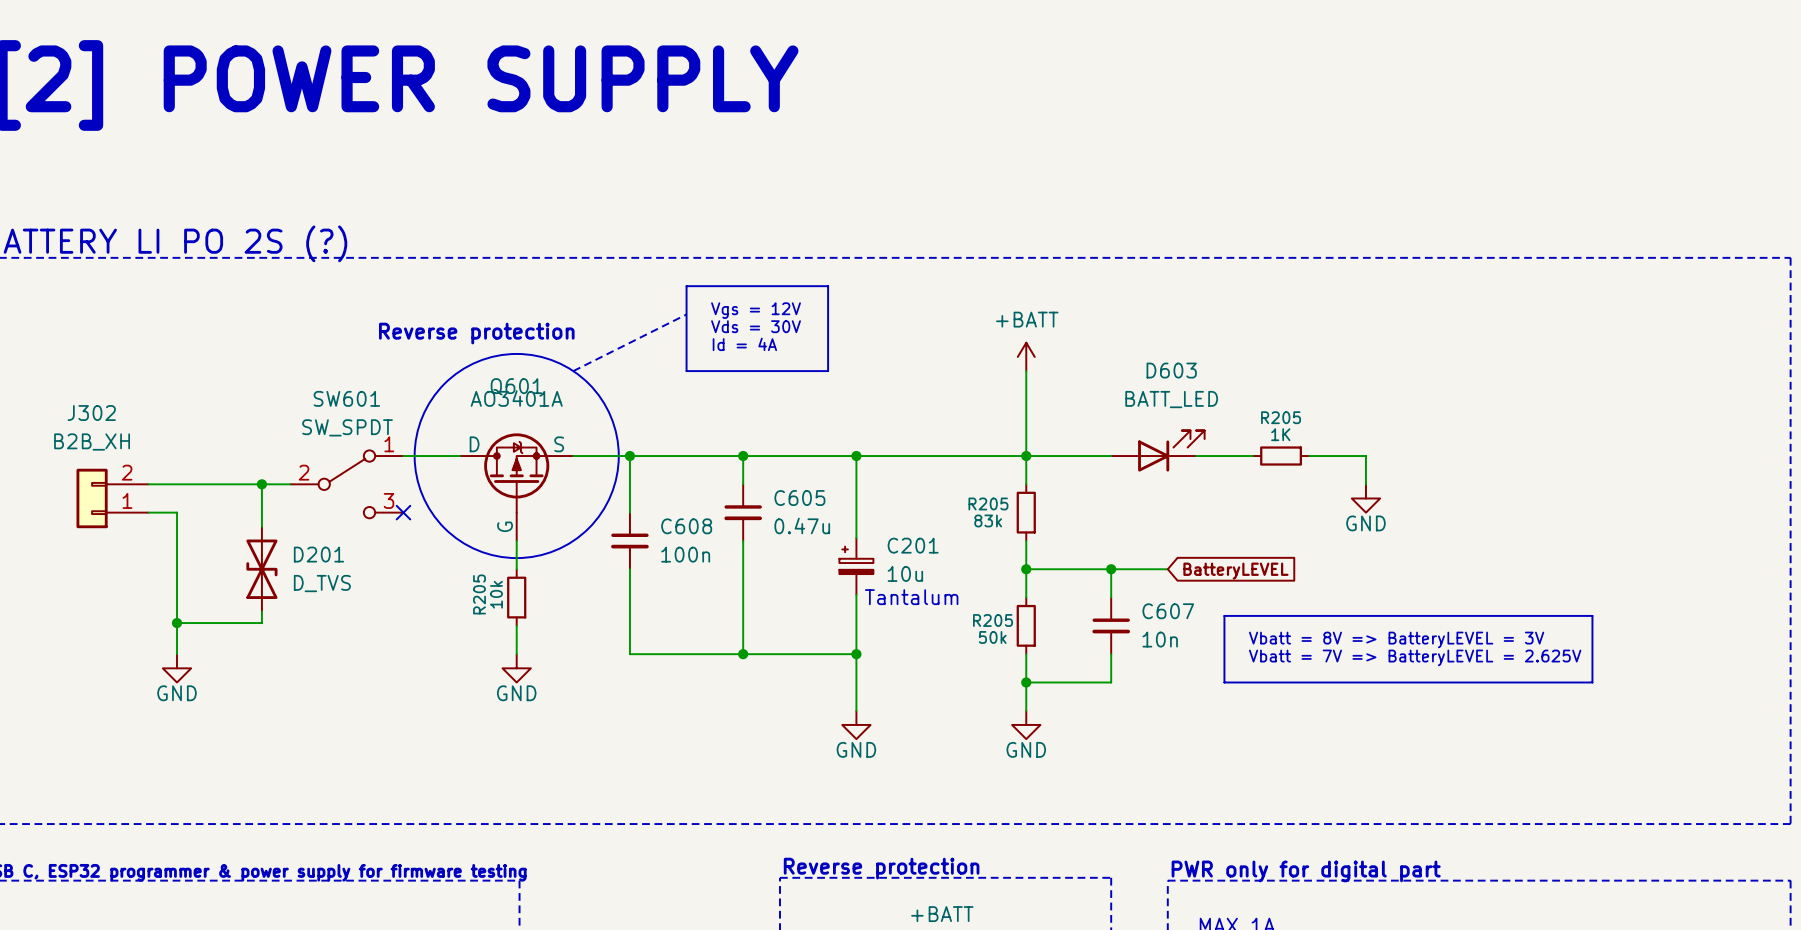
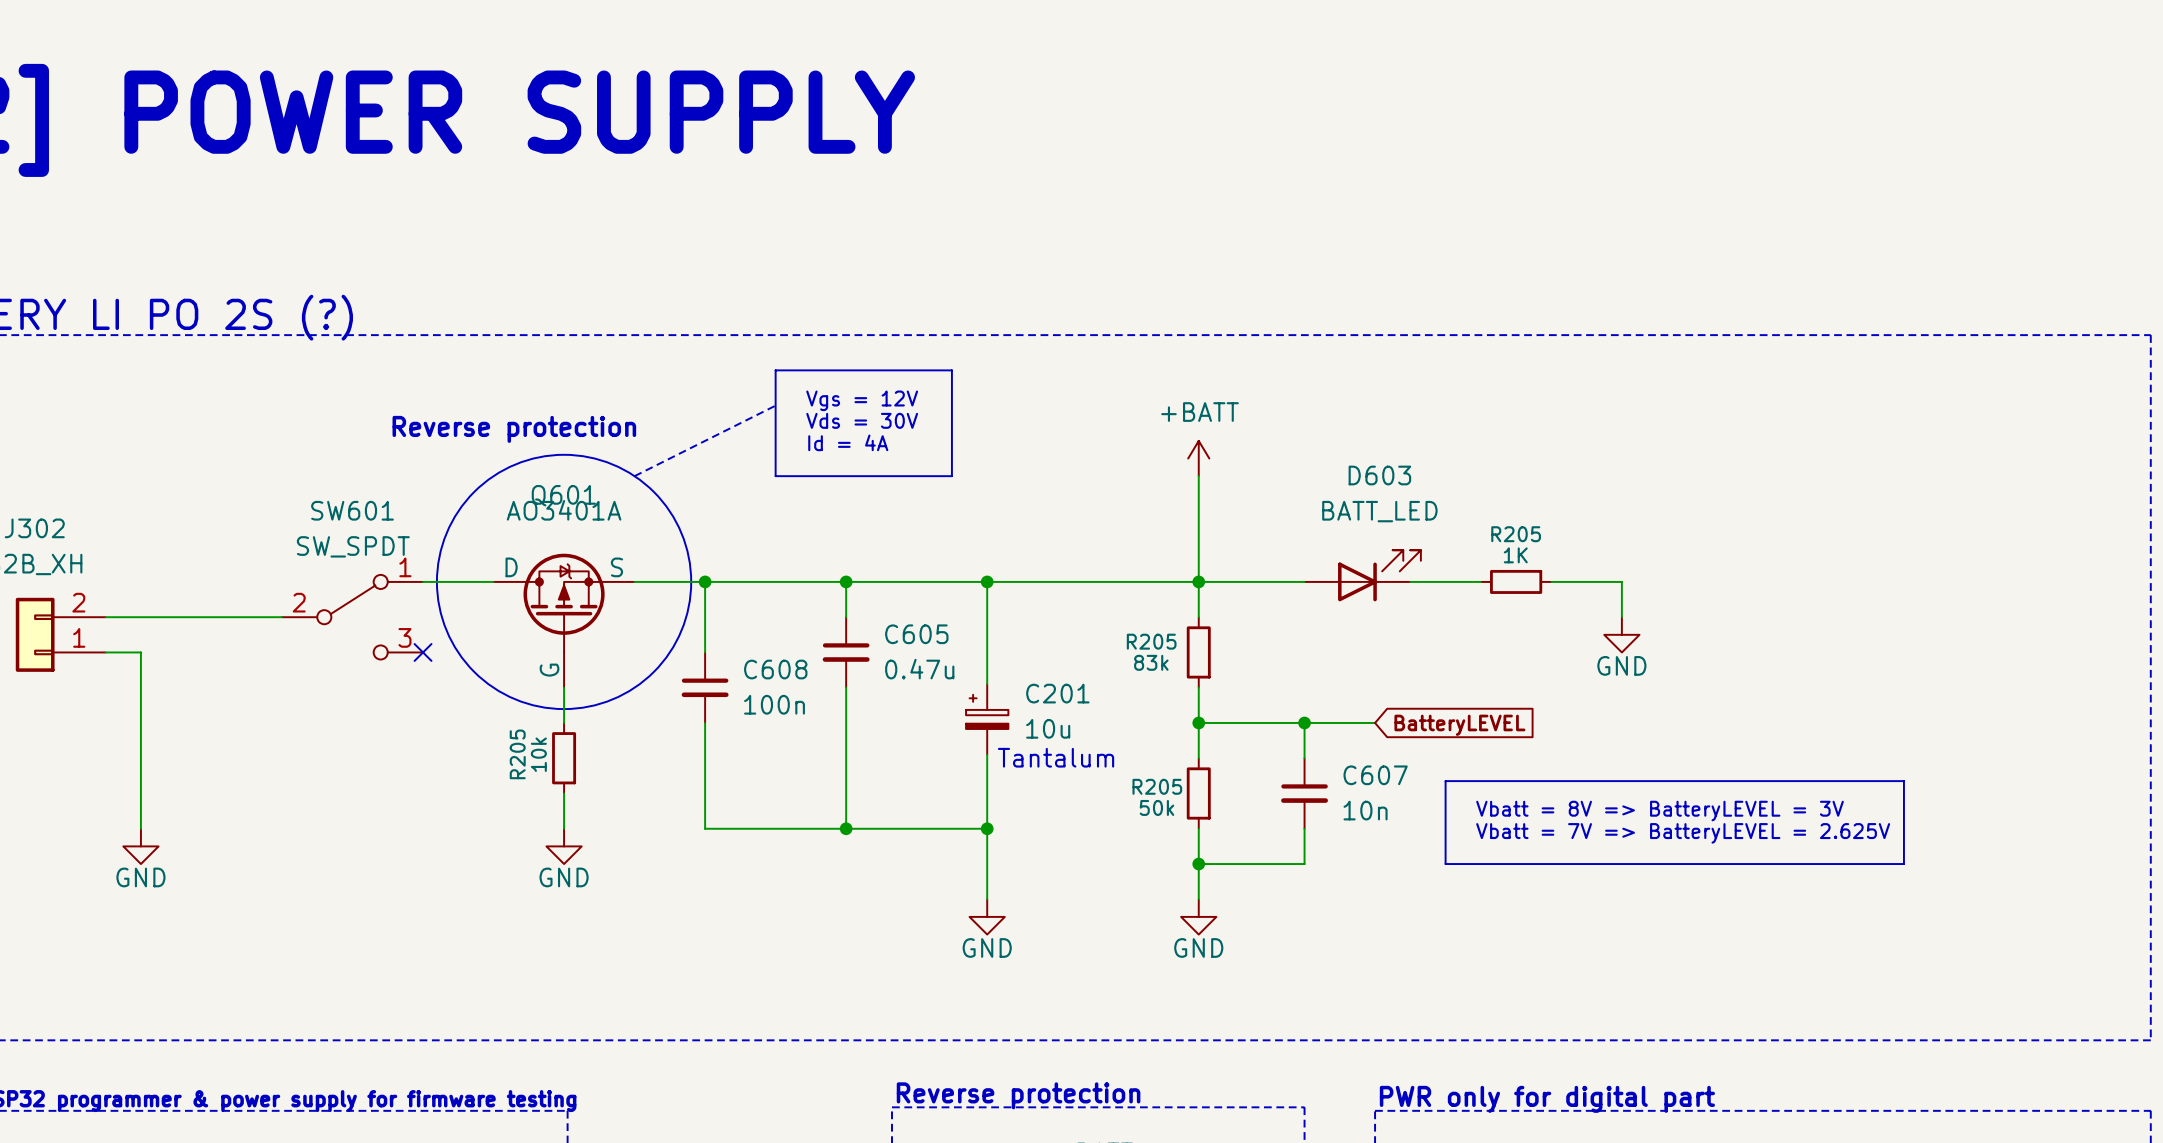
wire: (261, 484) (261, 526) -> none
junction: (261, 484) -> none
D201: D_TVS (261, 569) -> none
wire: (261, 611) (261, 623) (177, 623) -> none
junction: (177, 623) -> none

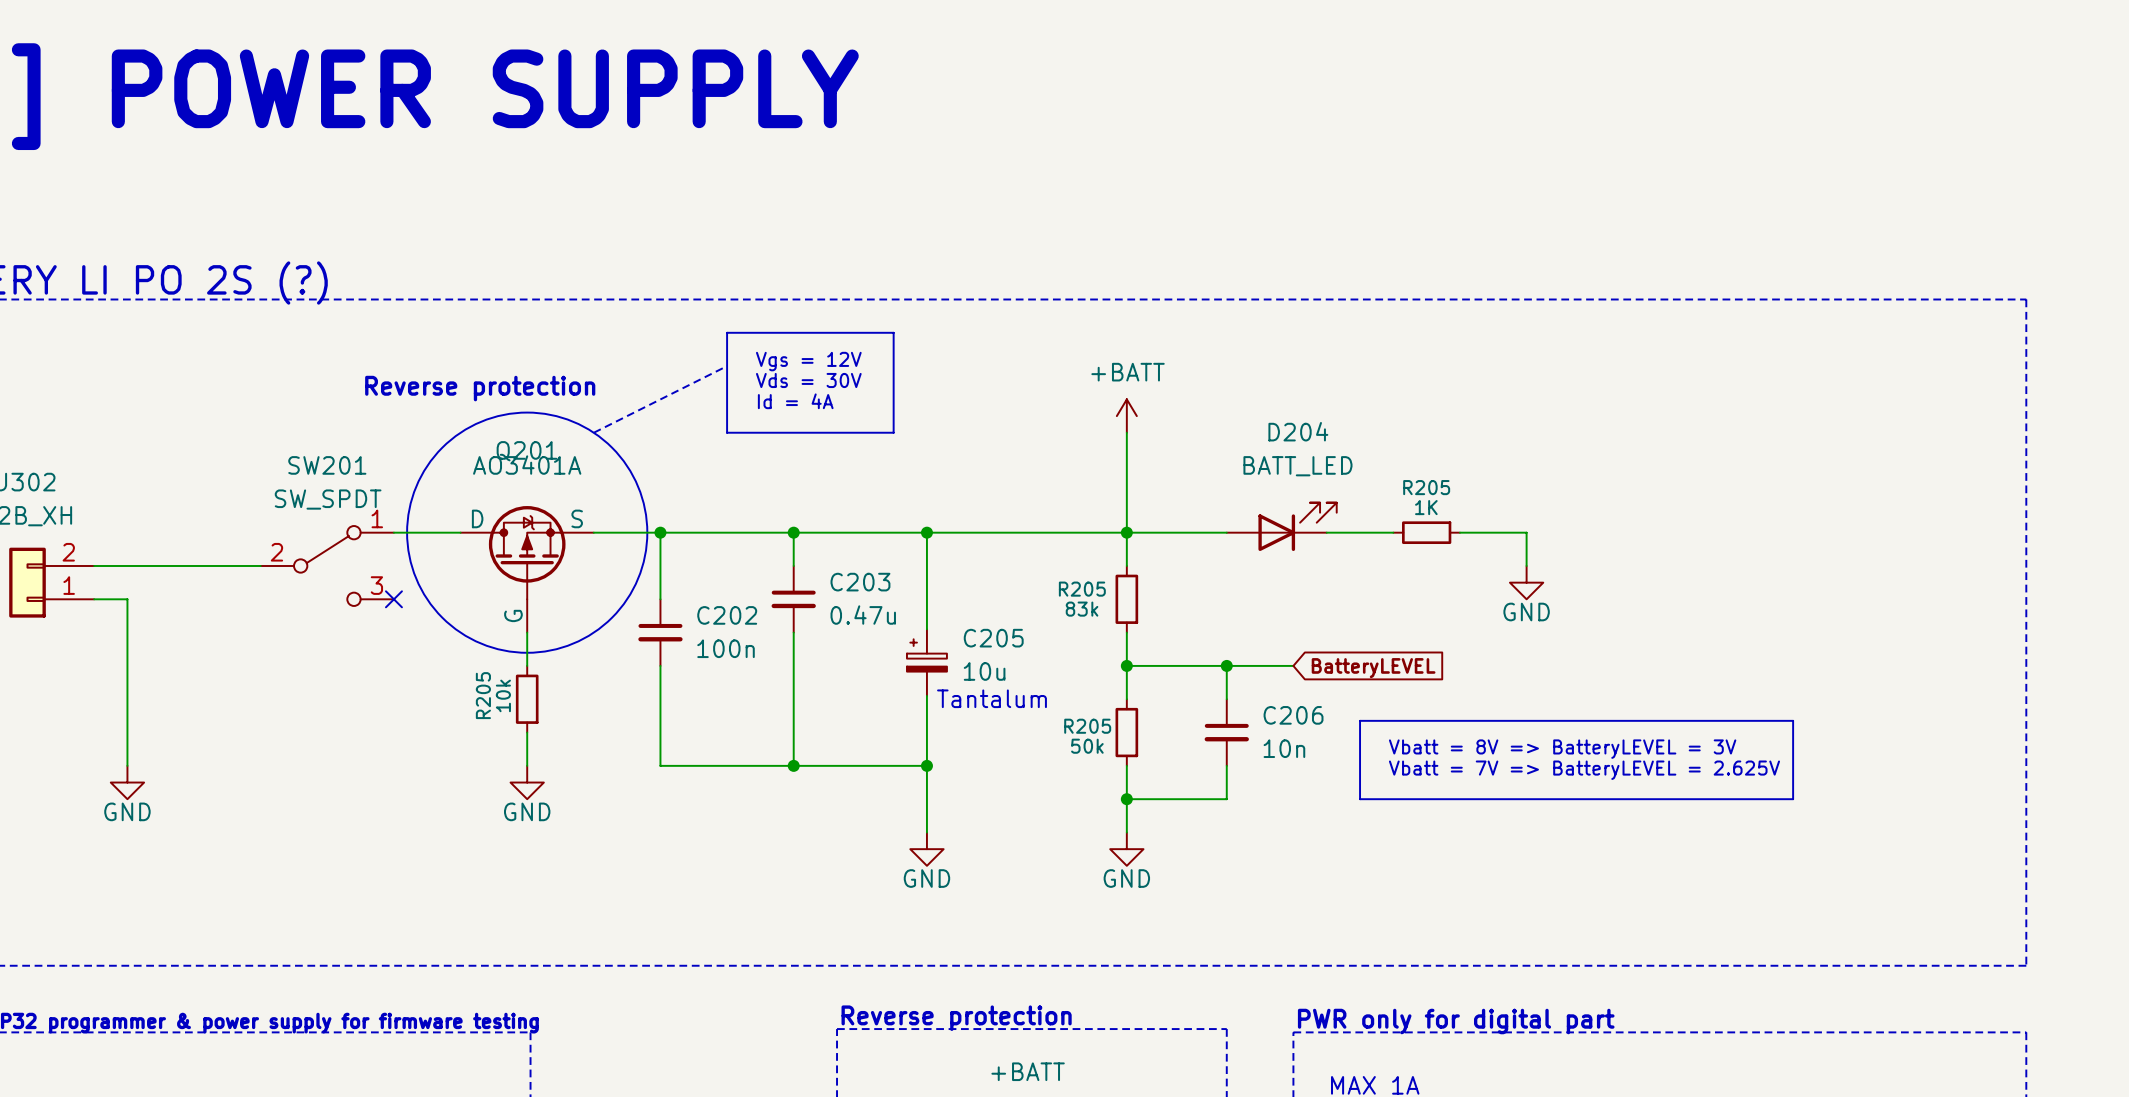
D603 name: D603 (1379, 475) -> D204 (1298, 431)
Q601 name: Q601 (563, 495) -> Q201 (526, 451)
SW601 name: SW601 (352, 510) -> SW201 (327, 465)
C605 name: C605 (916, 634) -> C203 (860, 582)
C608 name: C608 (775, 669) -> C202 (727, 615)
C201 name: C201 (1057, 693) -> C205 (993, 638)
C607 name: C607 (1375, 775) -> C206 (1293, 715)

